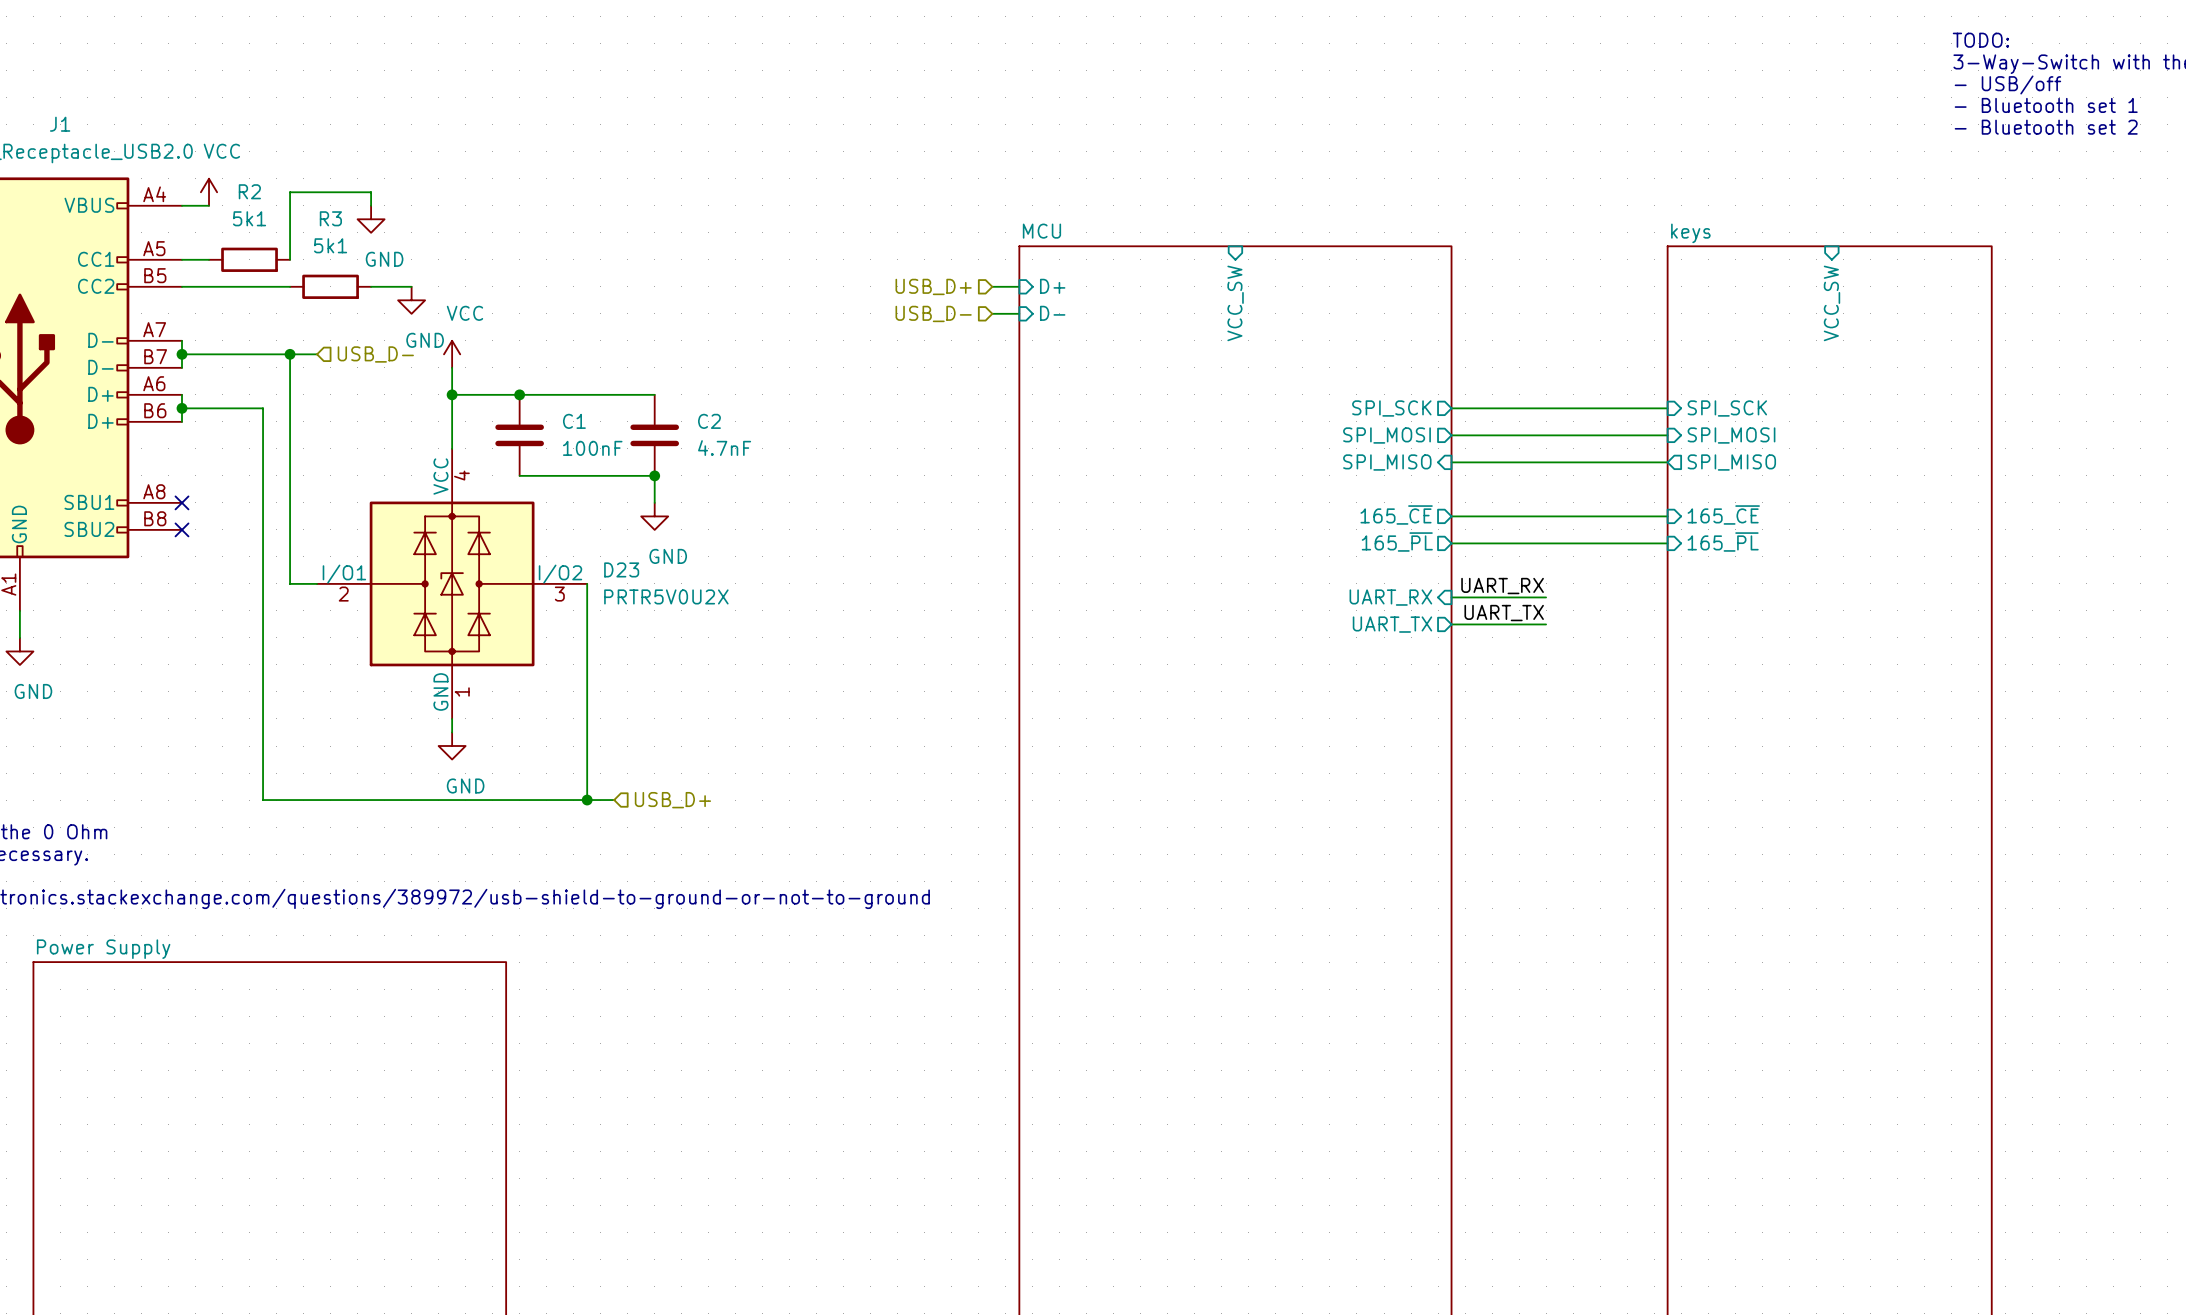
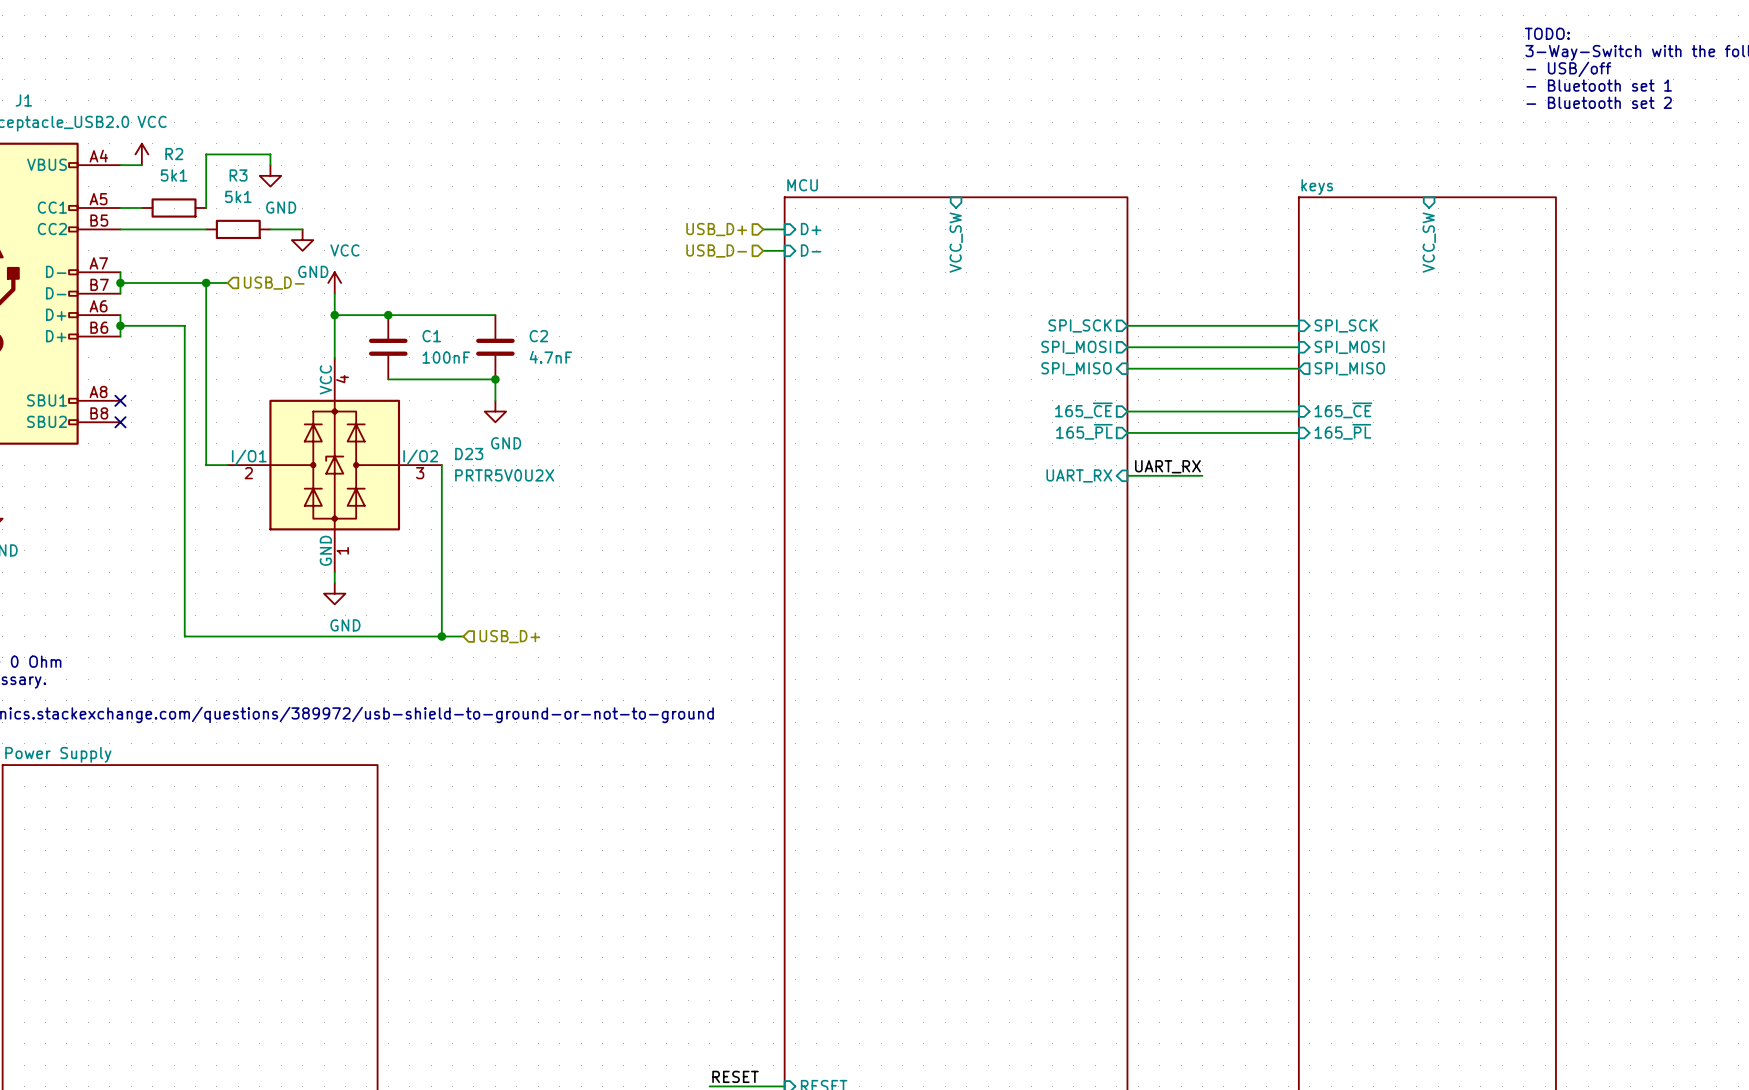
label: UART_TX (1504, 613) -> none
sheet pin: UART_TX (1392, 624) -> none
wire: (1451, 624) (1546, 624) -> none

